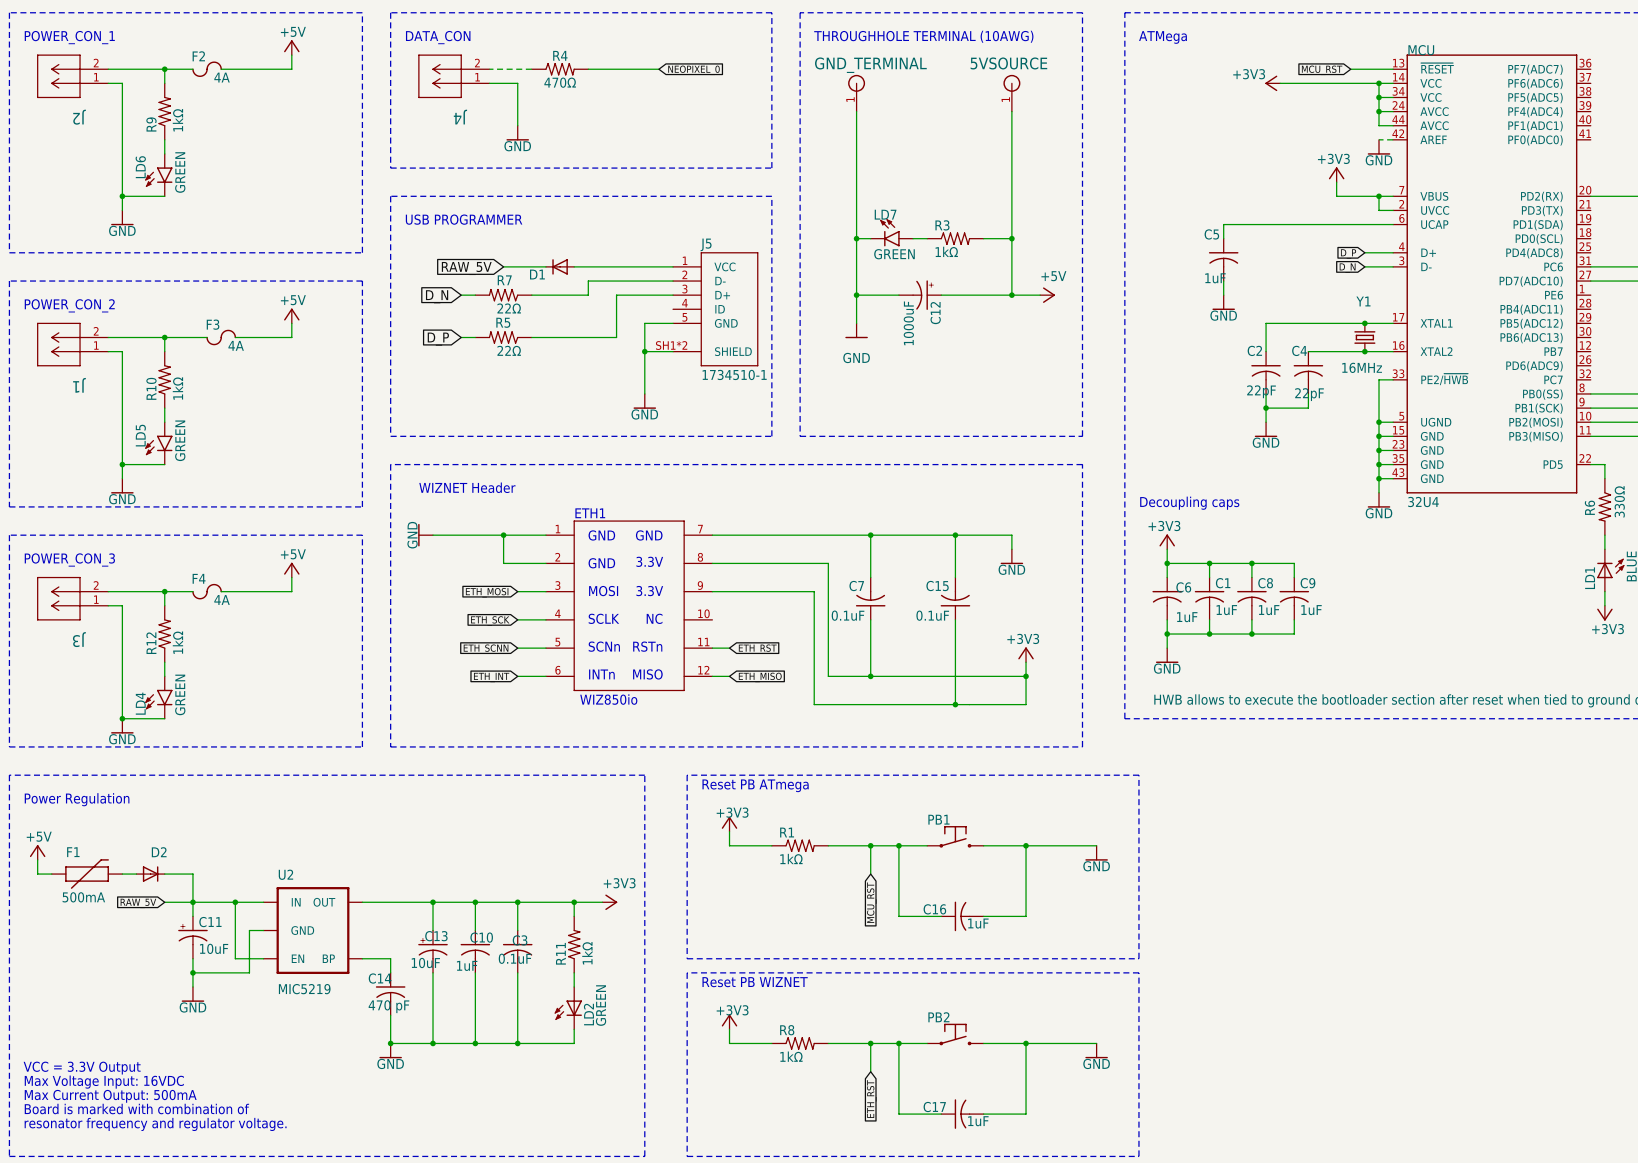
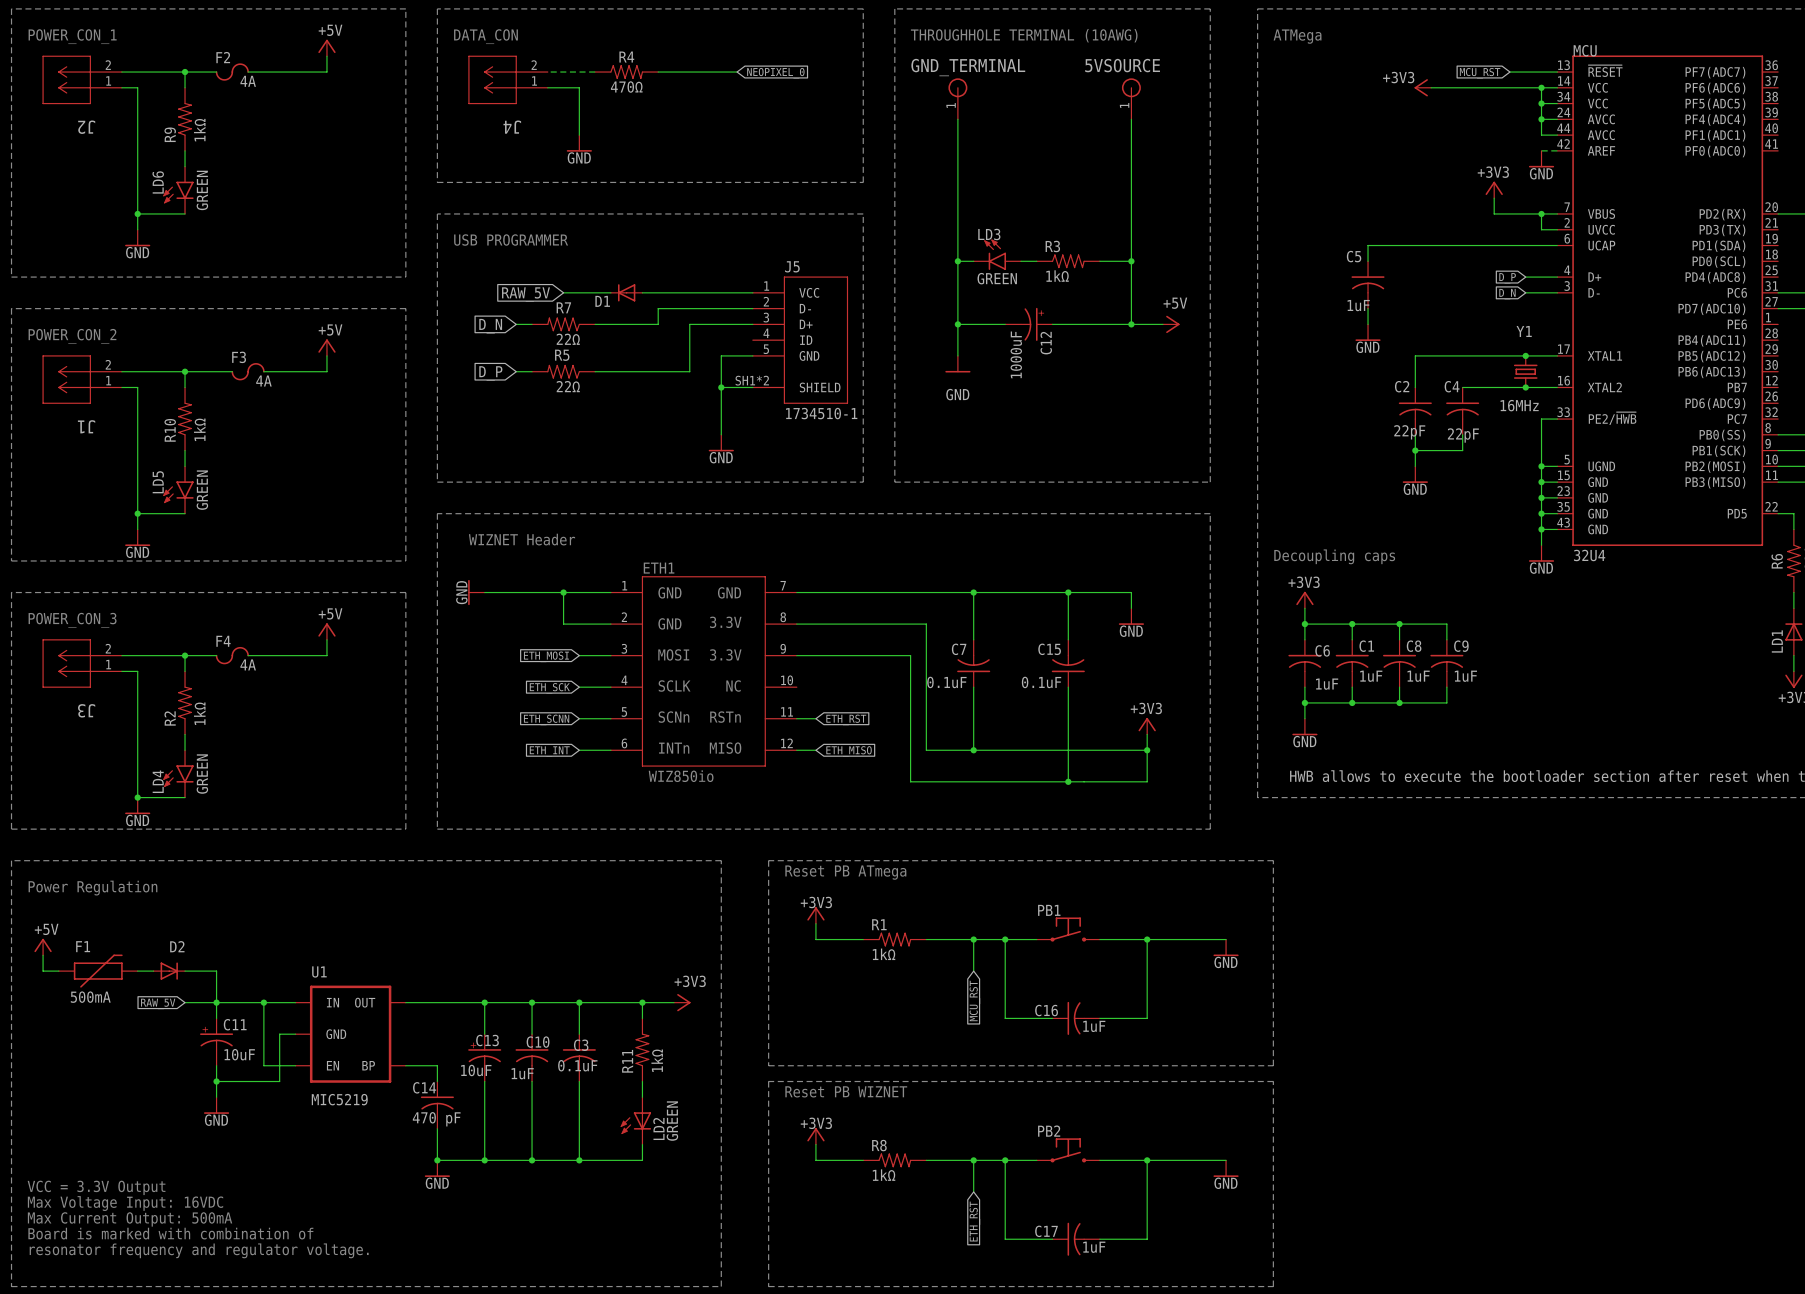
LD7 name: LD7 (885, 214) -> LD3 (989, 234)
R12 name: R12 (151, 643) -> R2 (170, 718)
U2 name: U2 (285, 874) -> U1 (319, 971)

